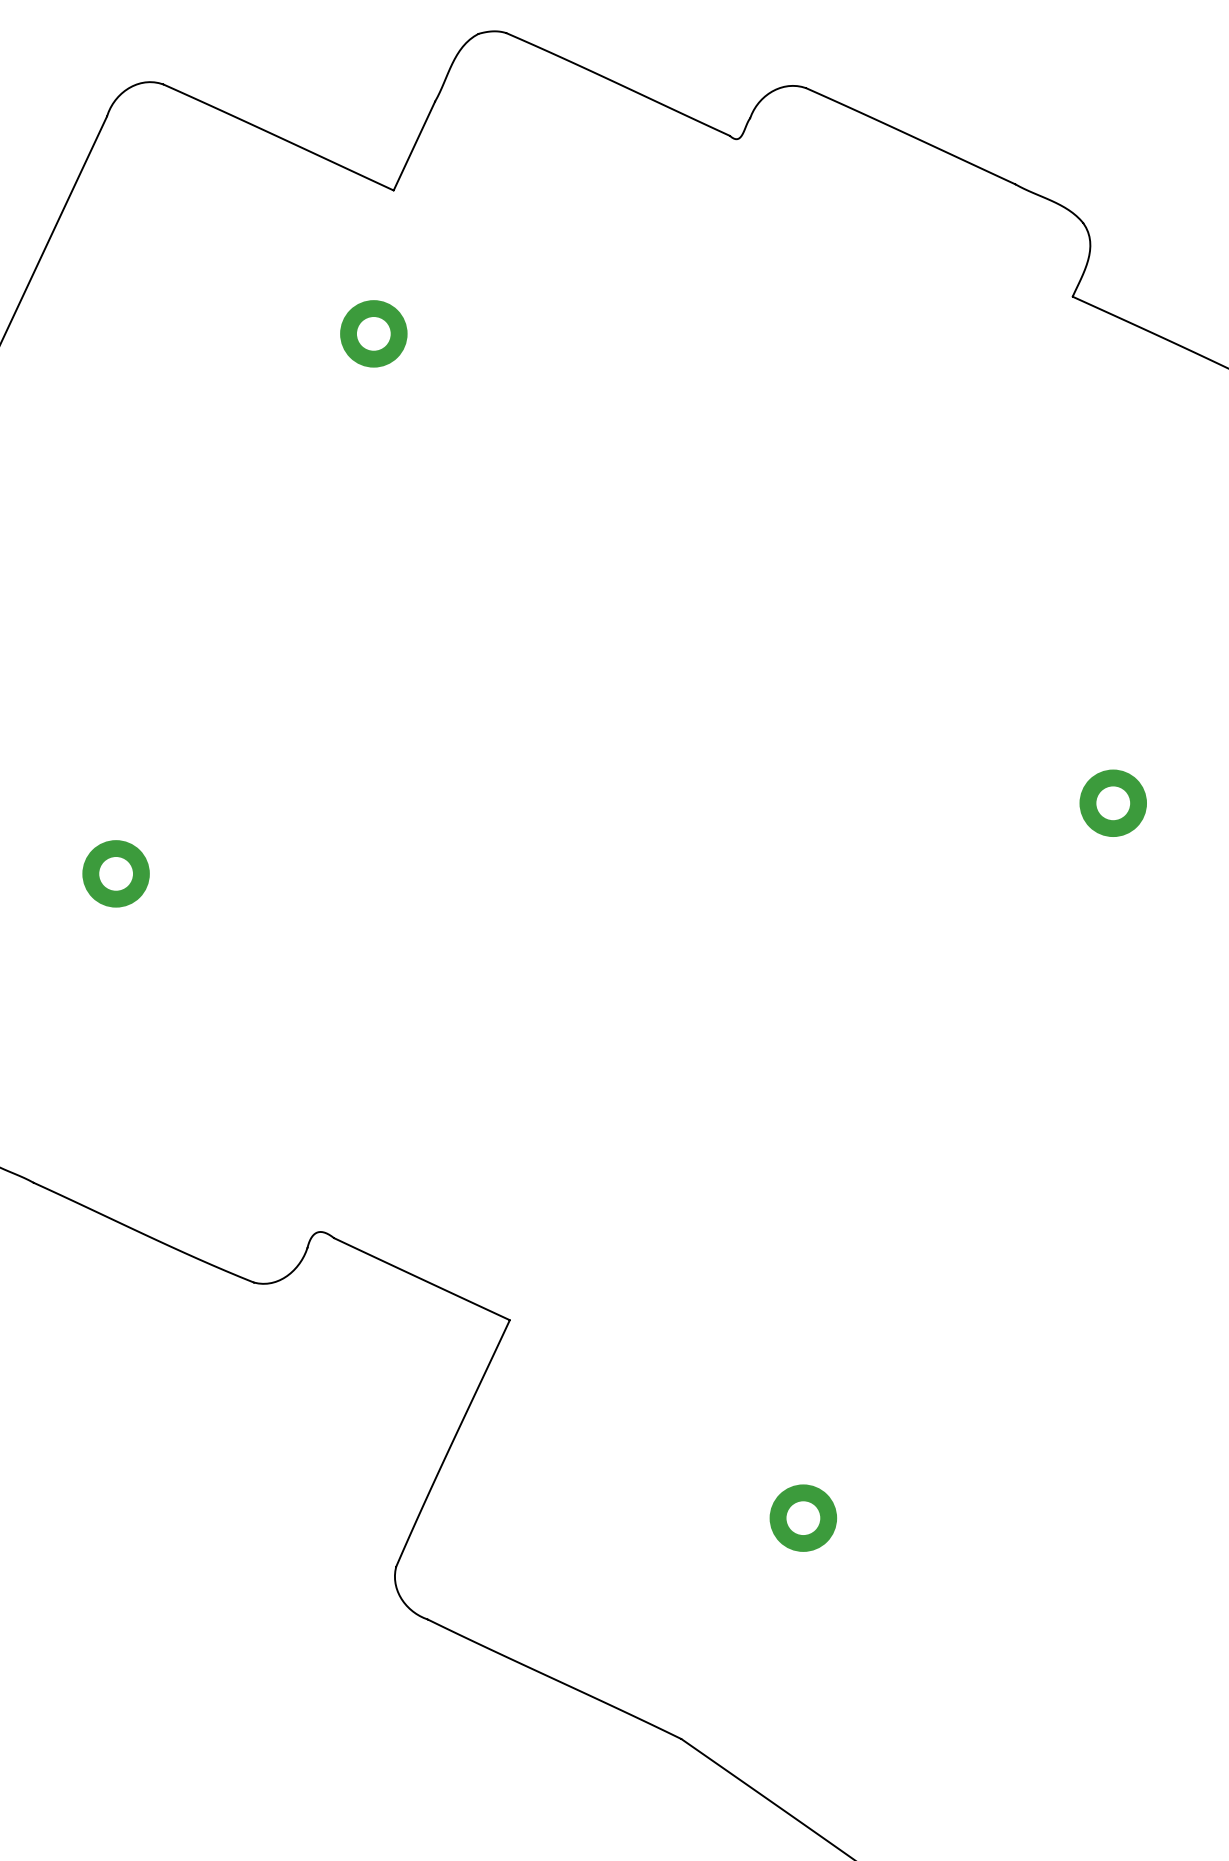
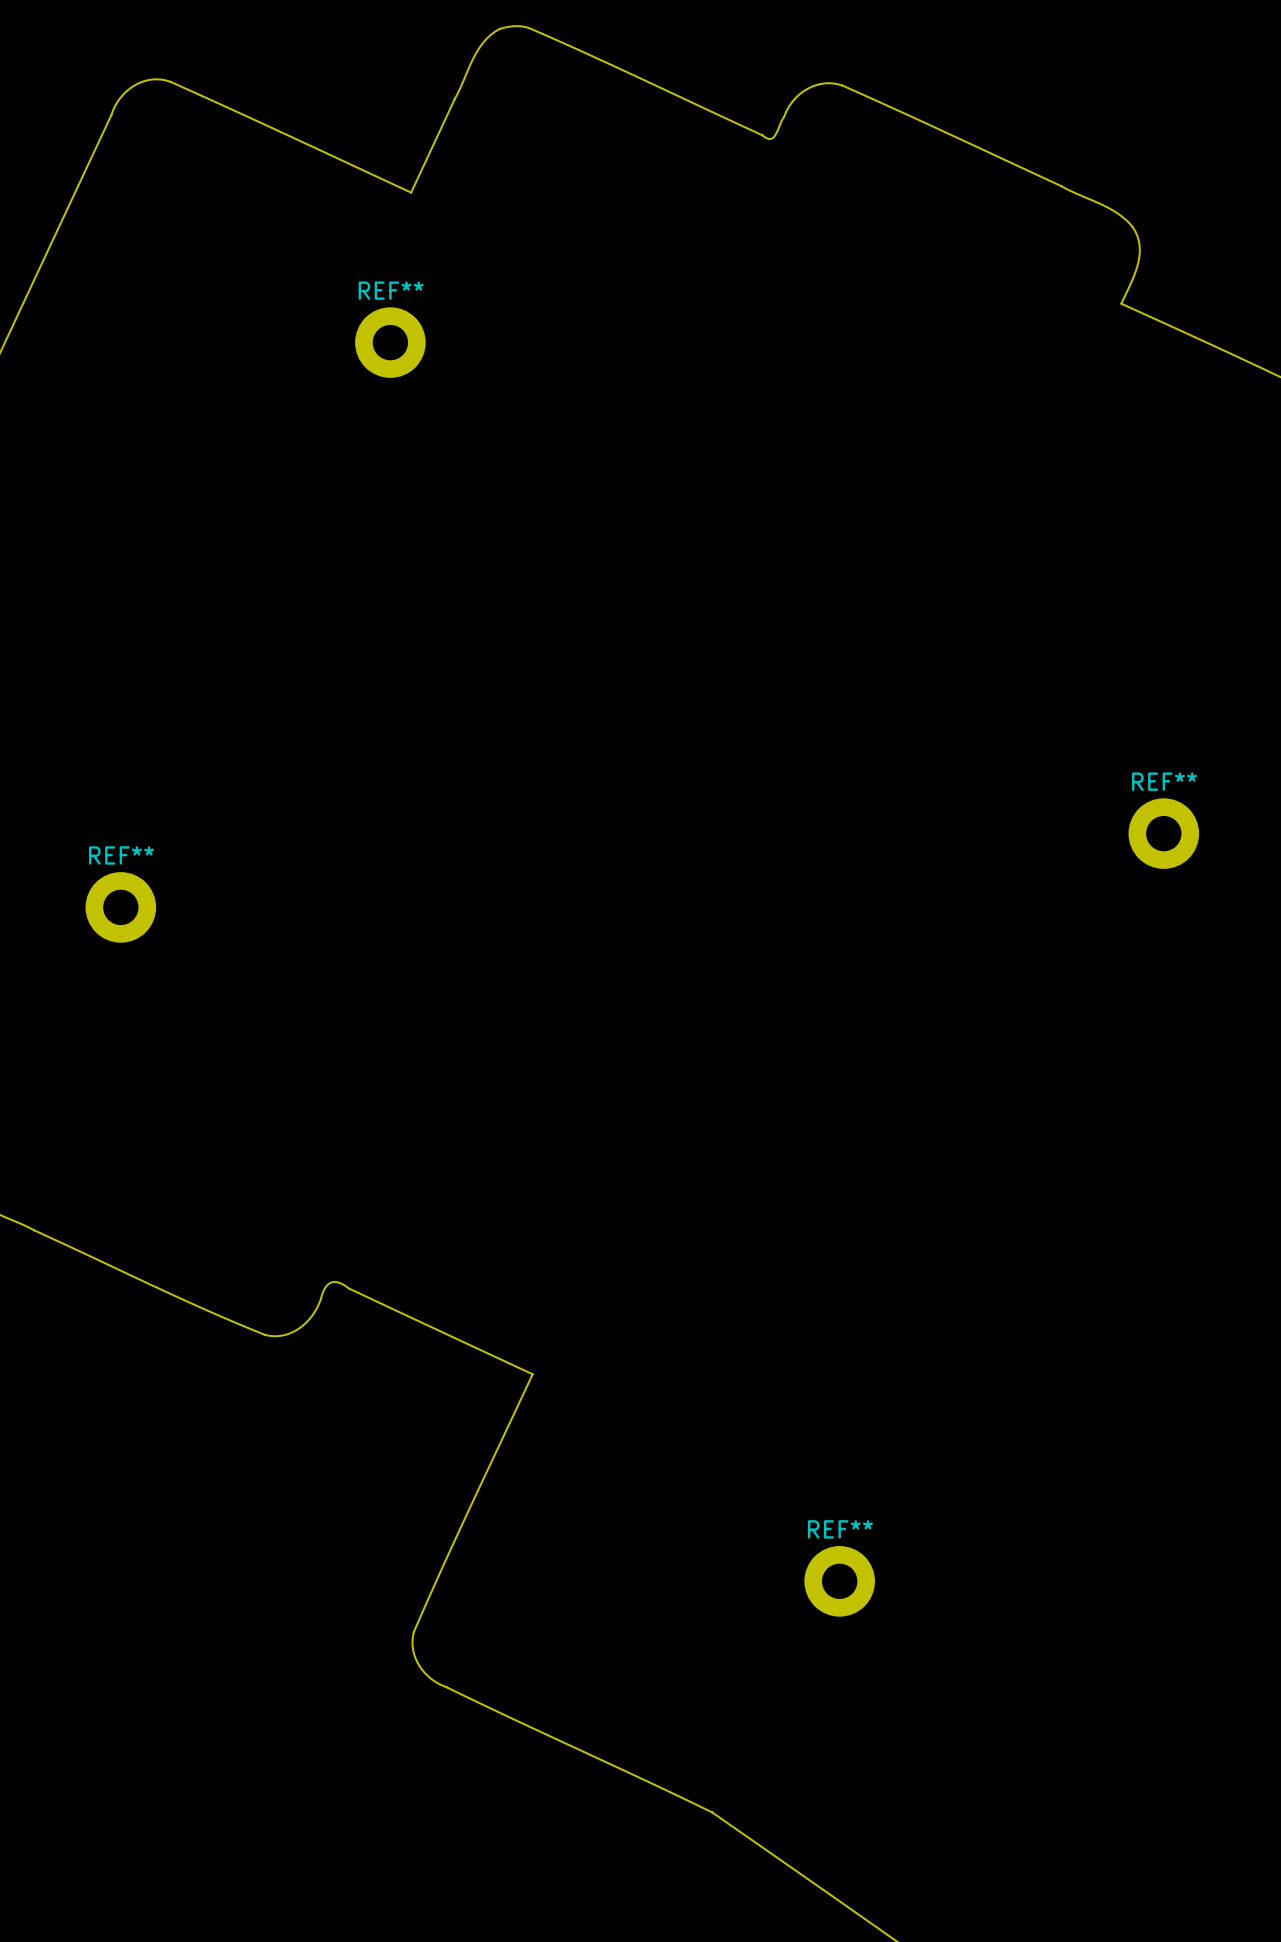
REF** name: none -> REF** (391, 290)
REF** name: none -> REF** (1164, 781)
REF** name: none -> REF** (121, 855)
REF** name: none -> REF** (840, 1529)

